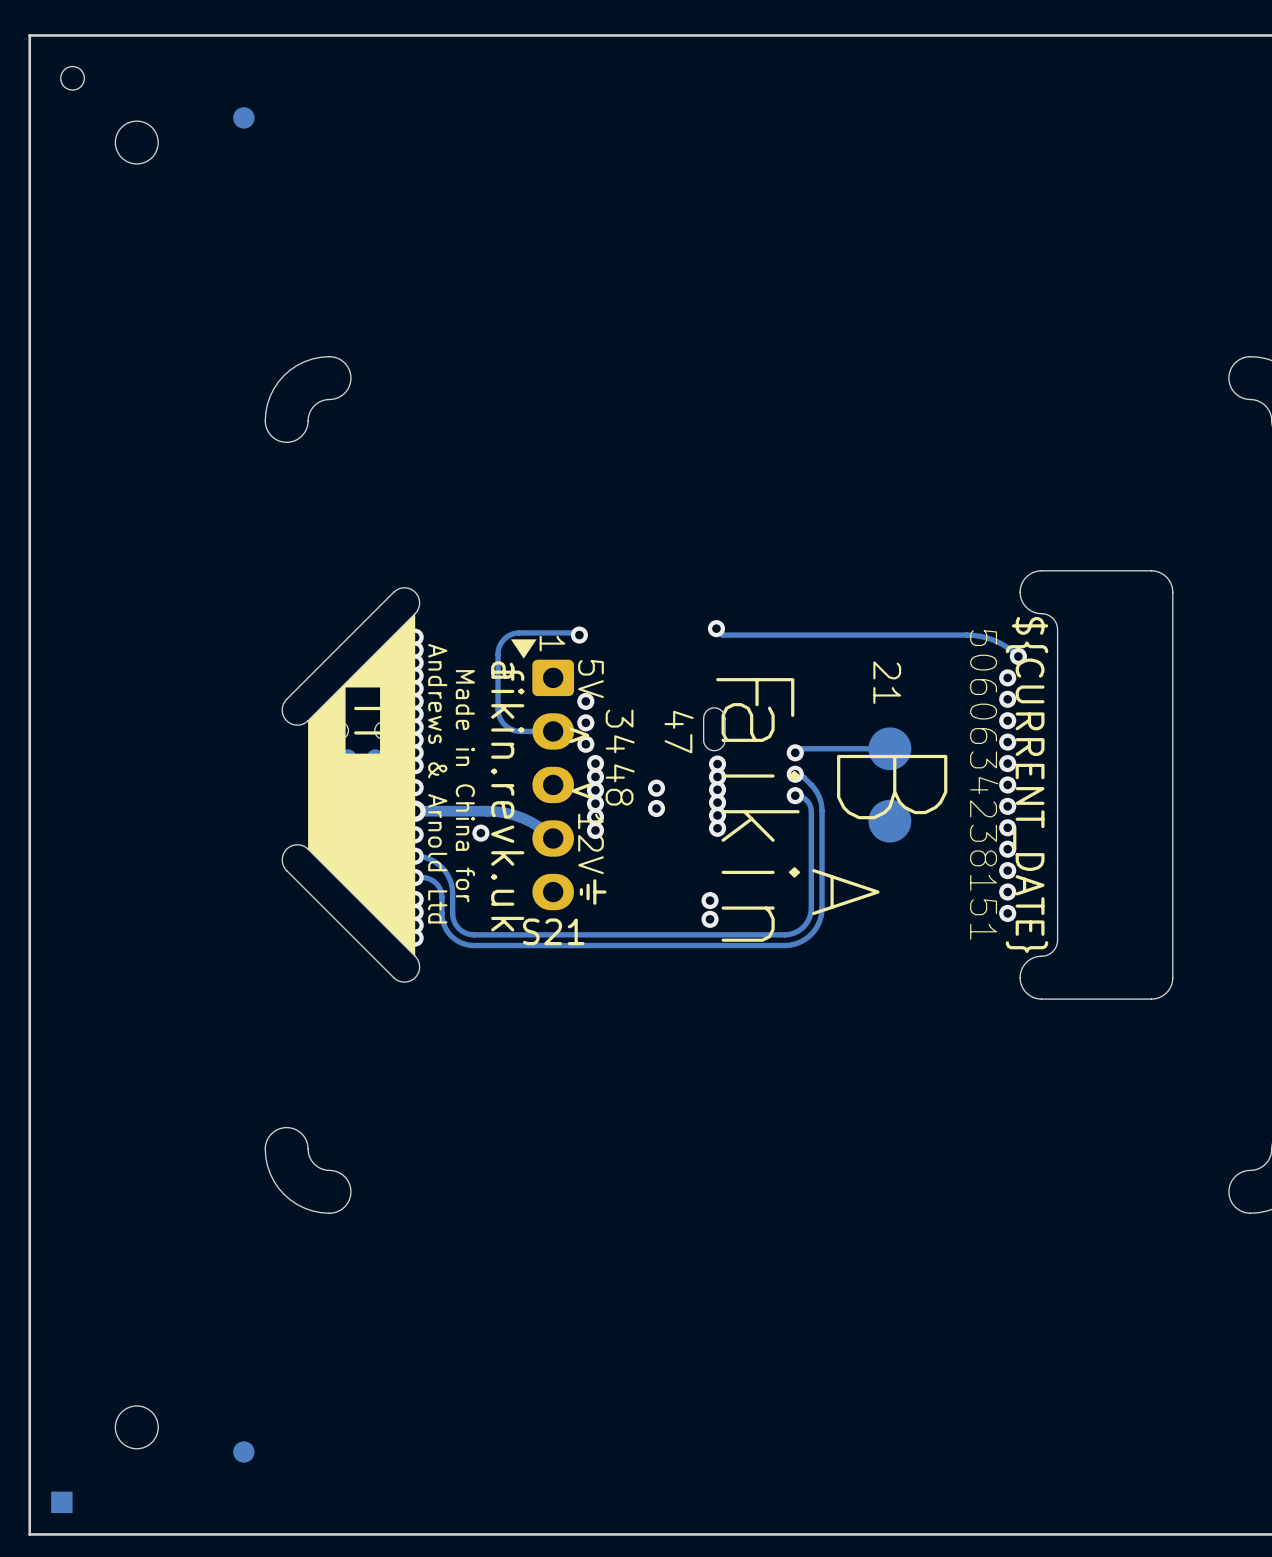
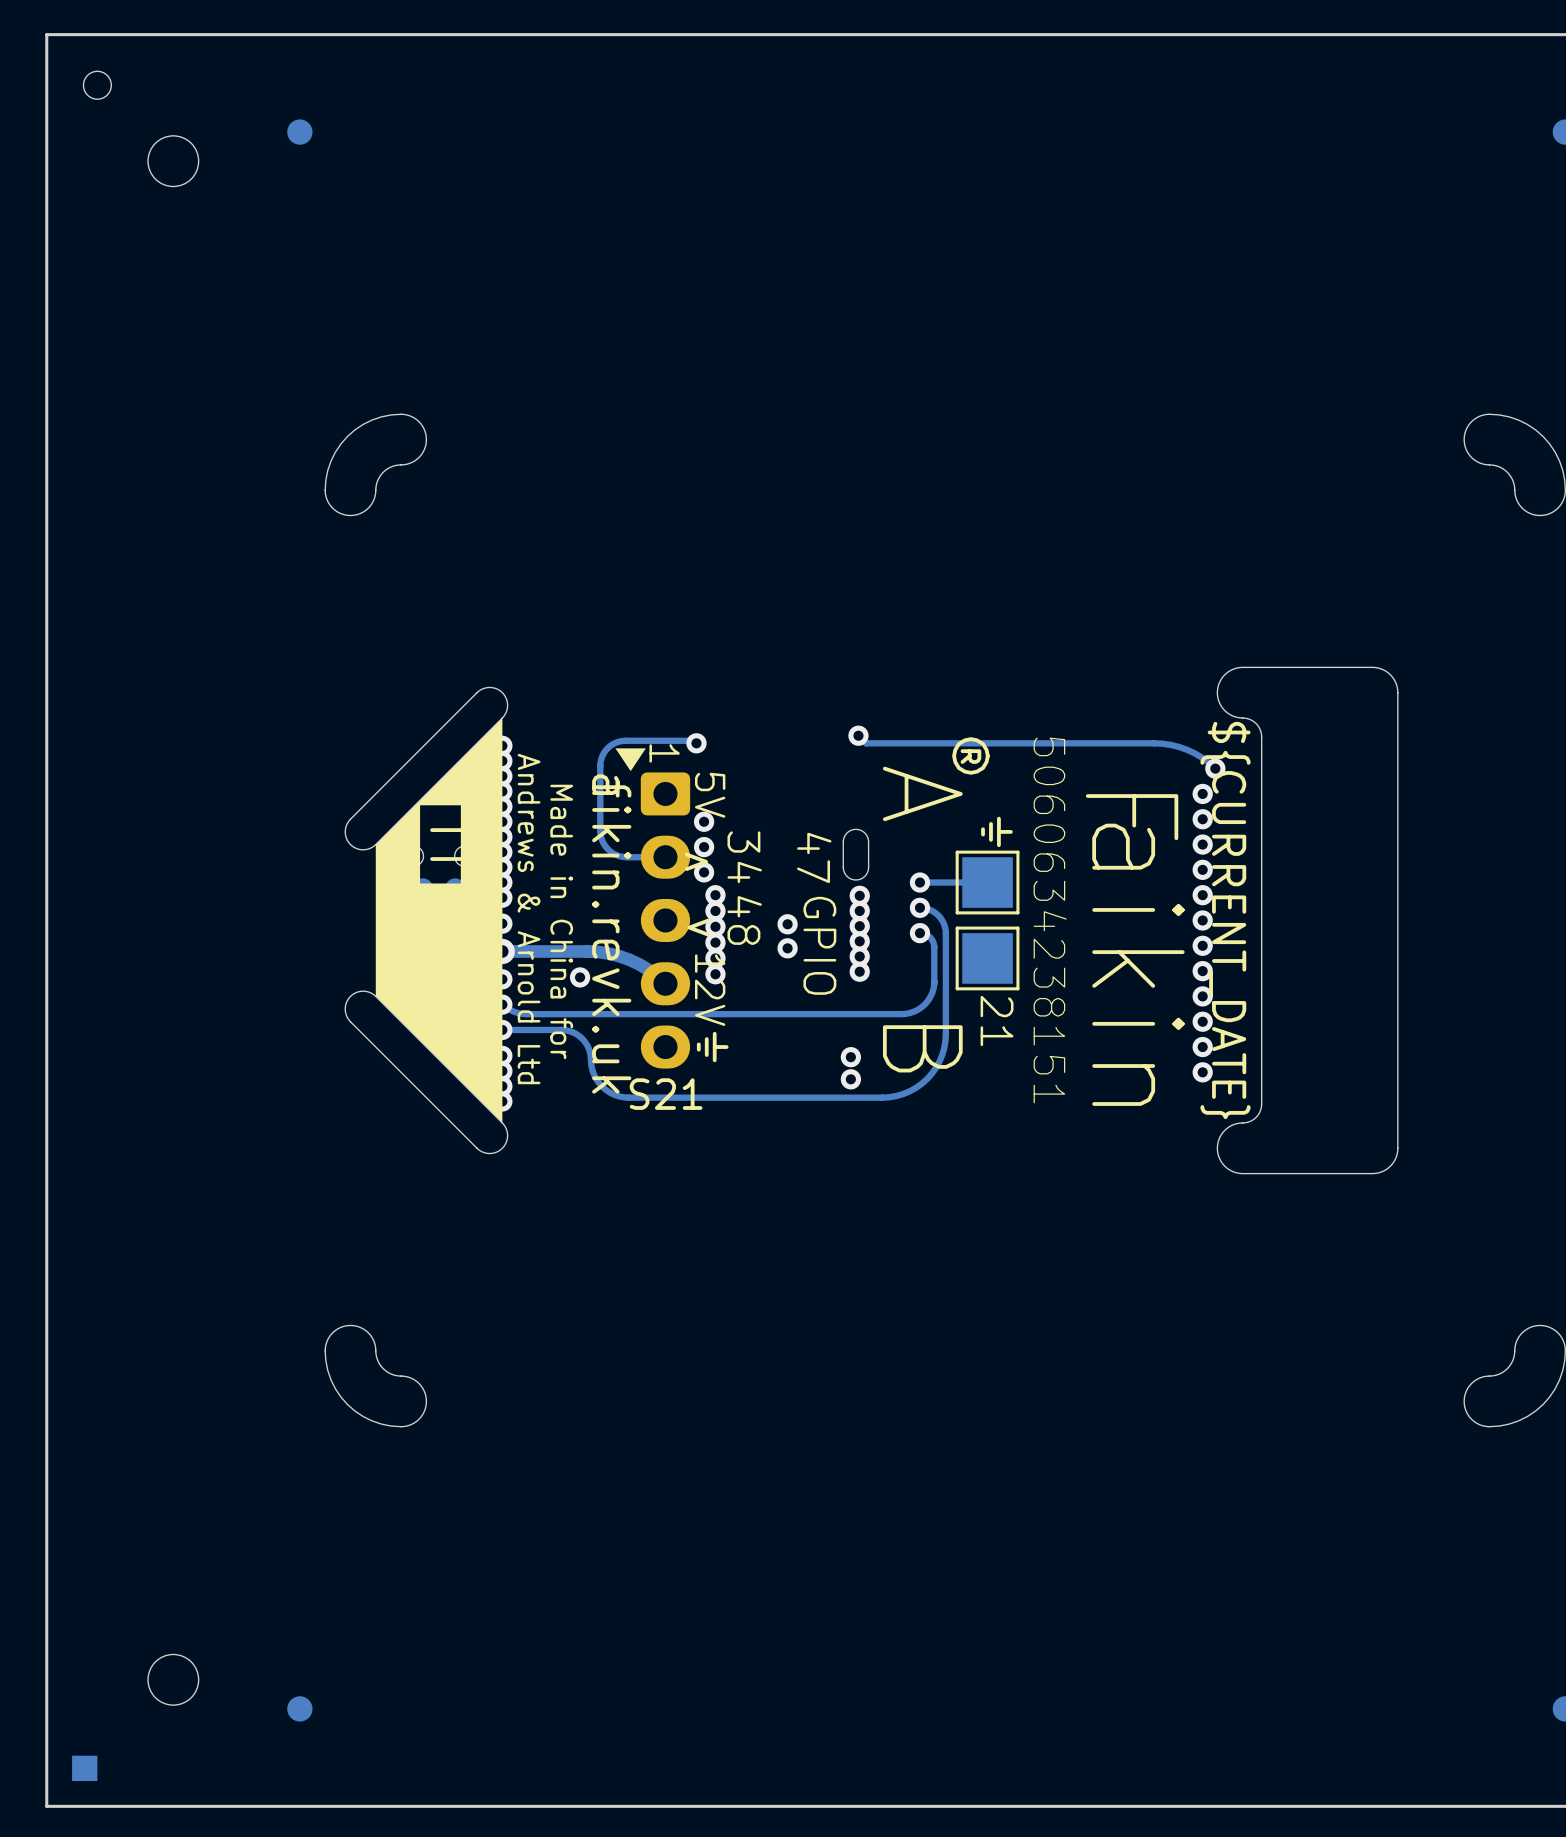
text: none -> ® (970, 755)
text position: 21 (887, 682) -> 21 (997, 1021)
text position: F (755, 697) -> F (1132, 817)
text: none -> ⏚ (996, 831)
track: (889, 748) (803, 748) (795, 752) -> none
via: none -> (919, 882)
via: (795, 752) -> none
track: none -> (987, 882) (919, 882)
part: none -> (987, 882)
via: none -> (919, 907)
track: (795, 774) (801, 775) (811, 784) (820, 801) (822, 908) (819, 920) (813, 931) (804, 939) (792, 944) (469, 945) (458, 941) (448, 932) (442, 917) (439, 888) (432, 880) (422, 877) -> none
via: (795, 774) -> none
part: (889, 784) -> none
text position: 5060634238151 (984, 784) -> 5060634238151 (1050, 920)
track: none -> (919, 933) (928, 936) (933, 943) (934, 983)
via: none -> (919, 933)
track: (795, 795) (805, 798) (811, 809) (811, 908) (809, 918) (800, 929) (791, 933) (736, 934) -> (919, 907) (936, 913) (945, 927) (944, 1048) (936, 1067) (921, 1083) (903, 1094) (882, 1097)
via: (795, 795) -> none
text: none -> GPIO (819, 945)
part: none -> (987, 958)
text position: aikin (760, 822) -> aikin (1138, 964)
track: none -> (934, 981) (931, 995) (924, 1004) (915, 1010) (905, 1013) (526, 1014) (508, 1009)
track: (415, 856) (433, 861) (447, 874) (452, 888) (453, 918) (460, 930) (471, 934) (522, 934) -> (510, 1029) (561, 1029) (576, 1033) (584, 1041) (588, 1048) (592, 1069) (598, 1082) (614, 1094) (628, 1097)
text position: A (845, 892) -> A (922, 793)
text: none -> B (922, 1048)

